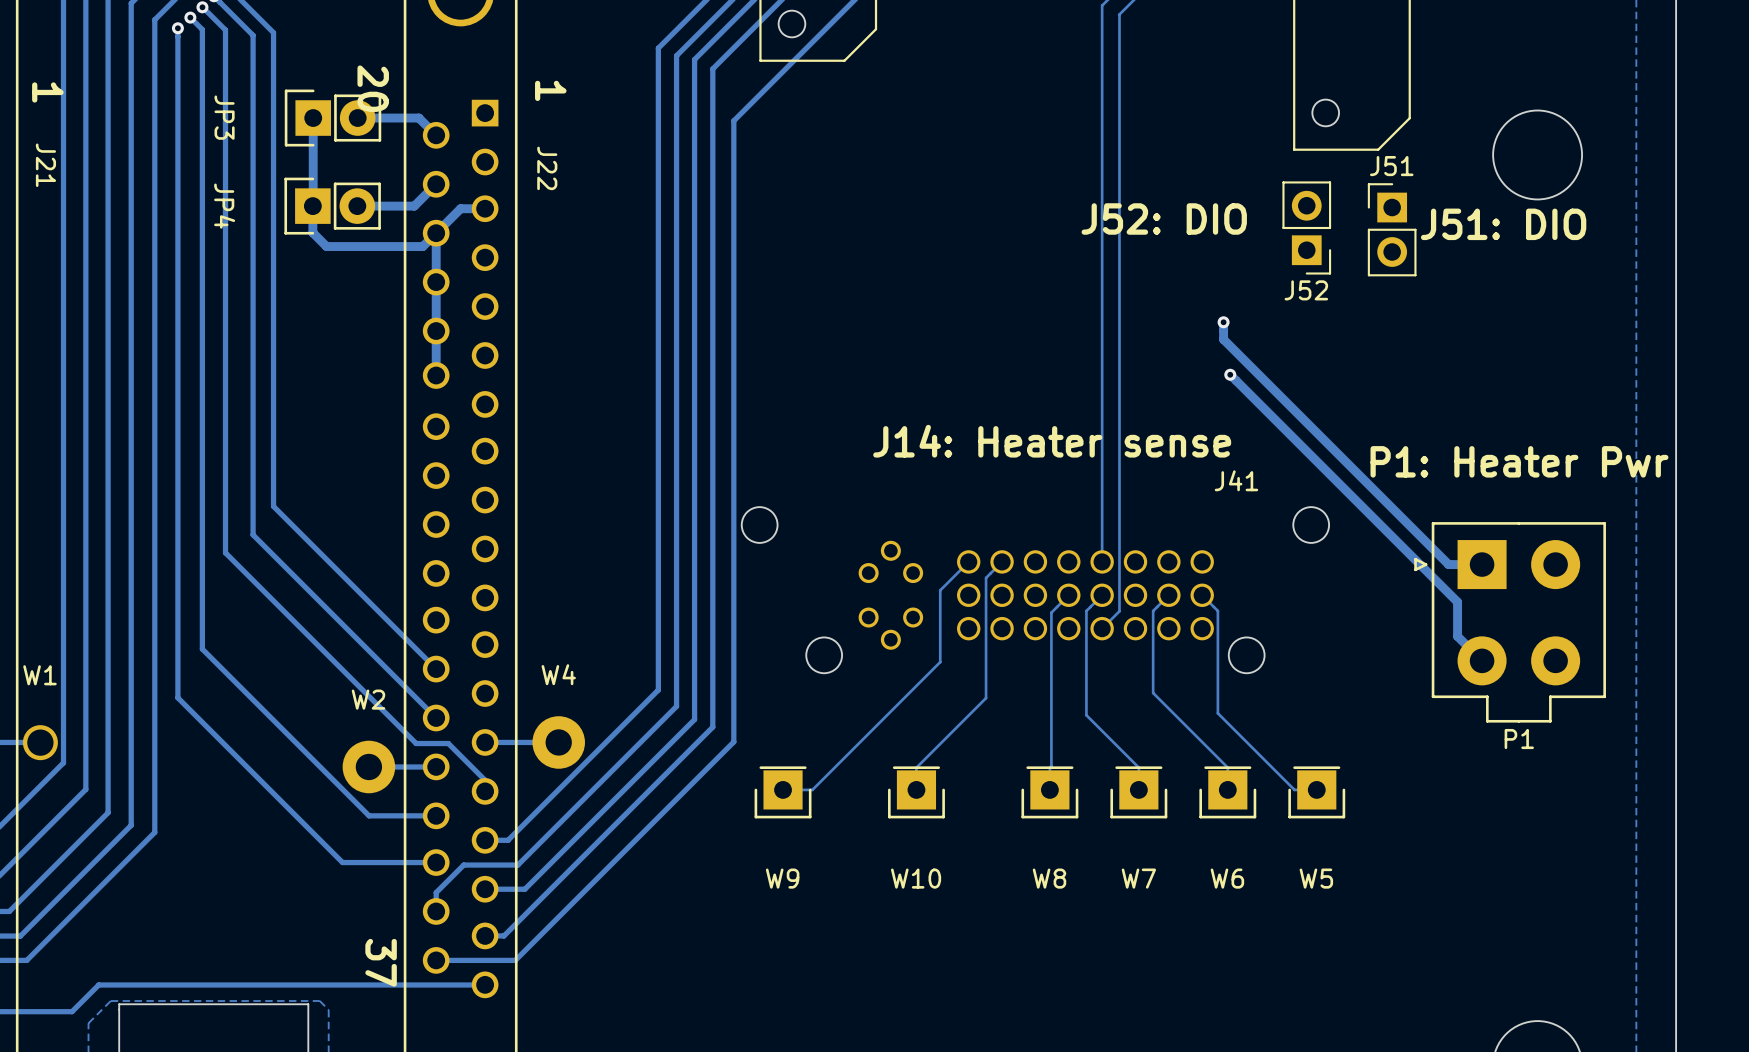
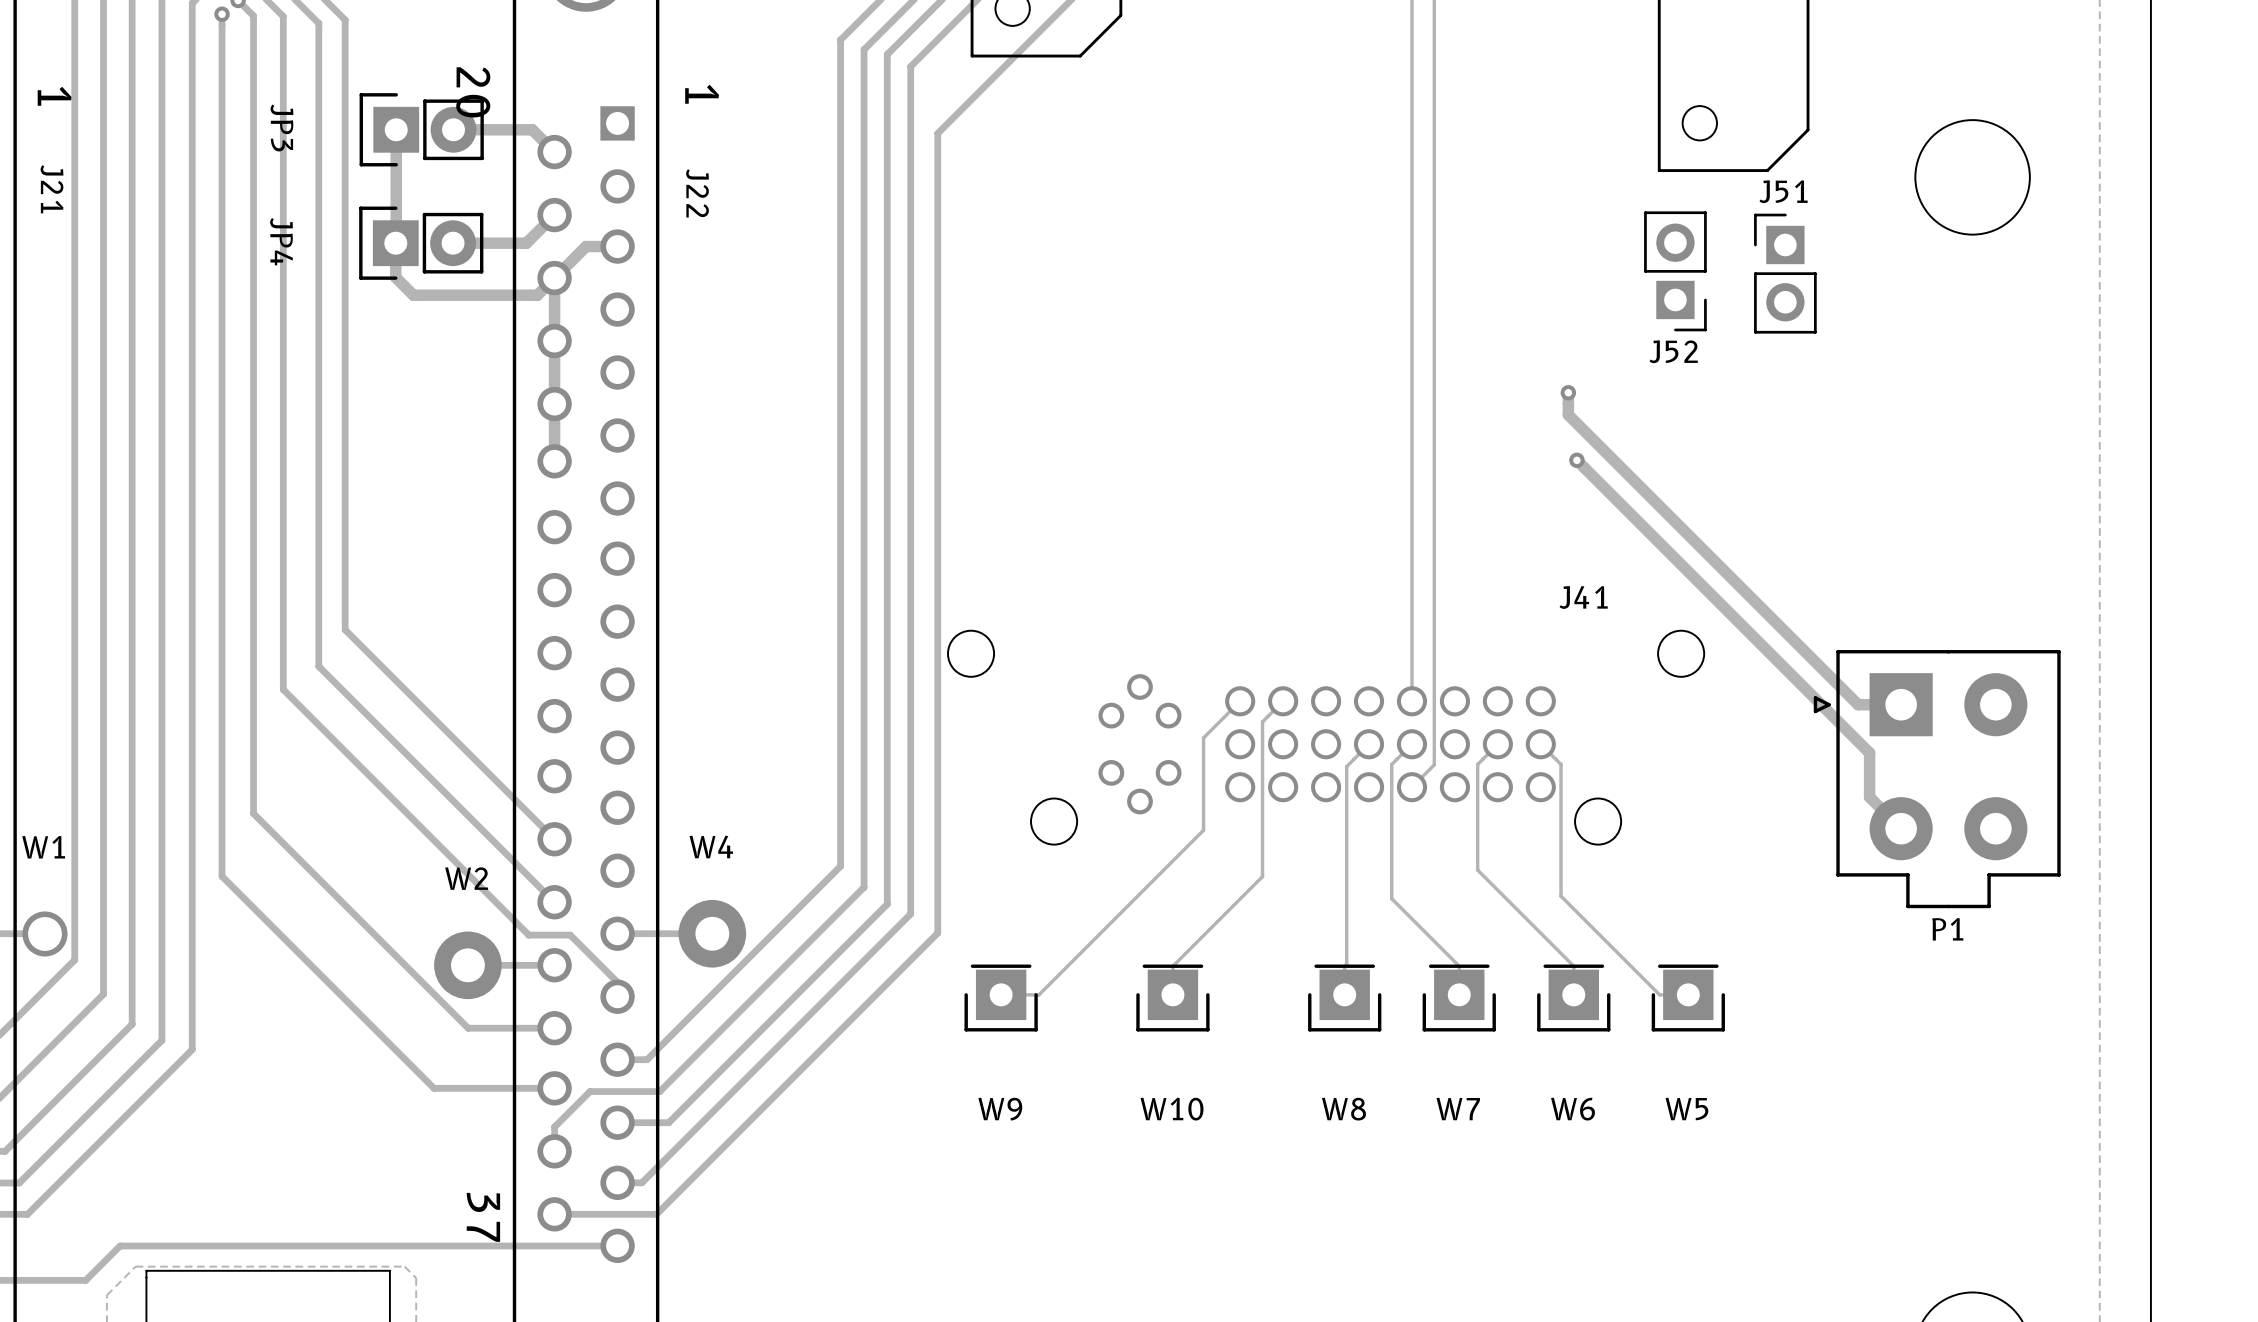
text: J52: DIO (1164, 218) -> none
text: J51: DIO (1503, 224) -> none
text: J14: Heater sense (1052, 441) -> none
text: P1: Heater Pwr (1519, 461) -> none

